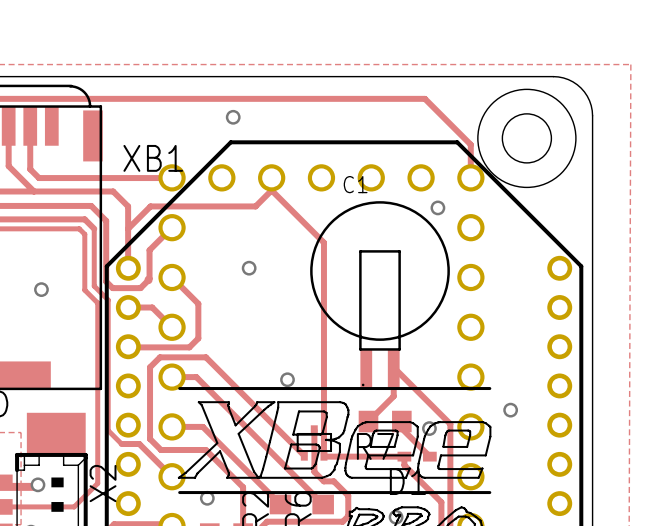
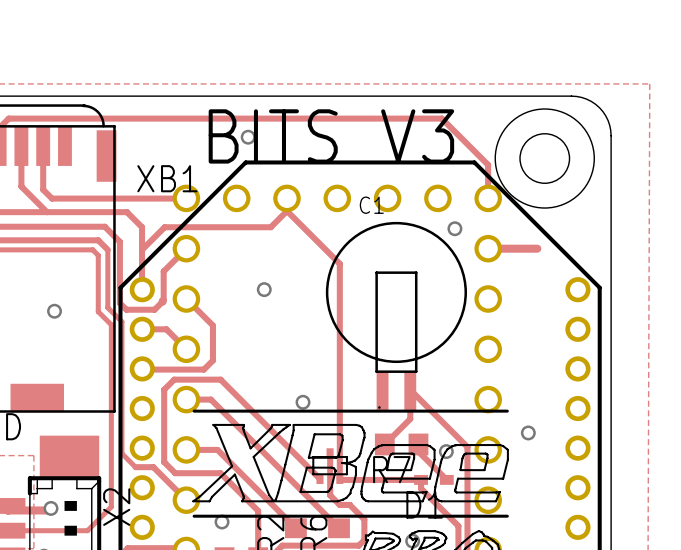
text: none -> BITS V3 (331, 136)
track: none -> (488, 248) (537, 248)

